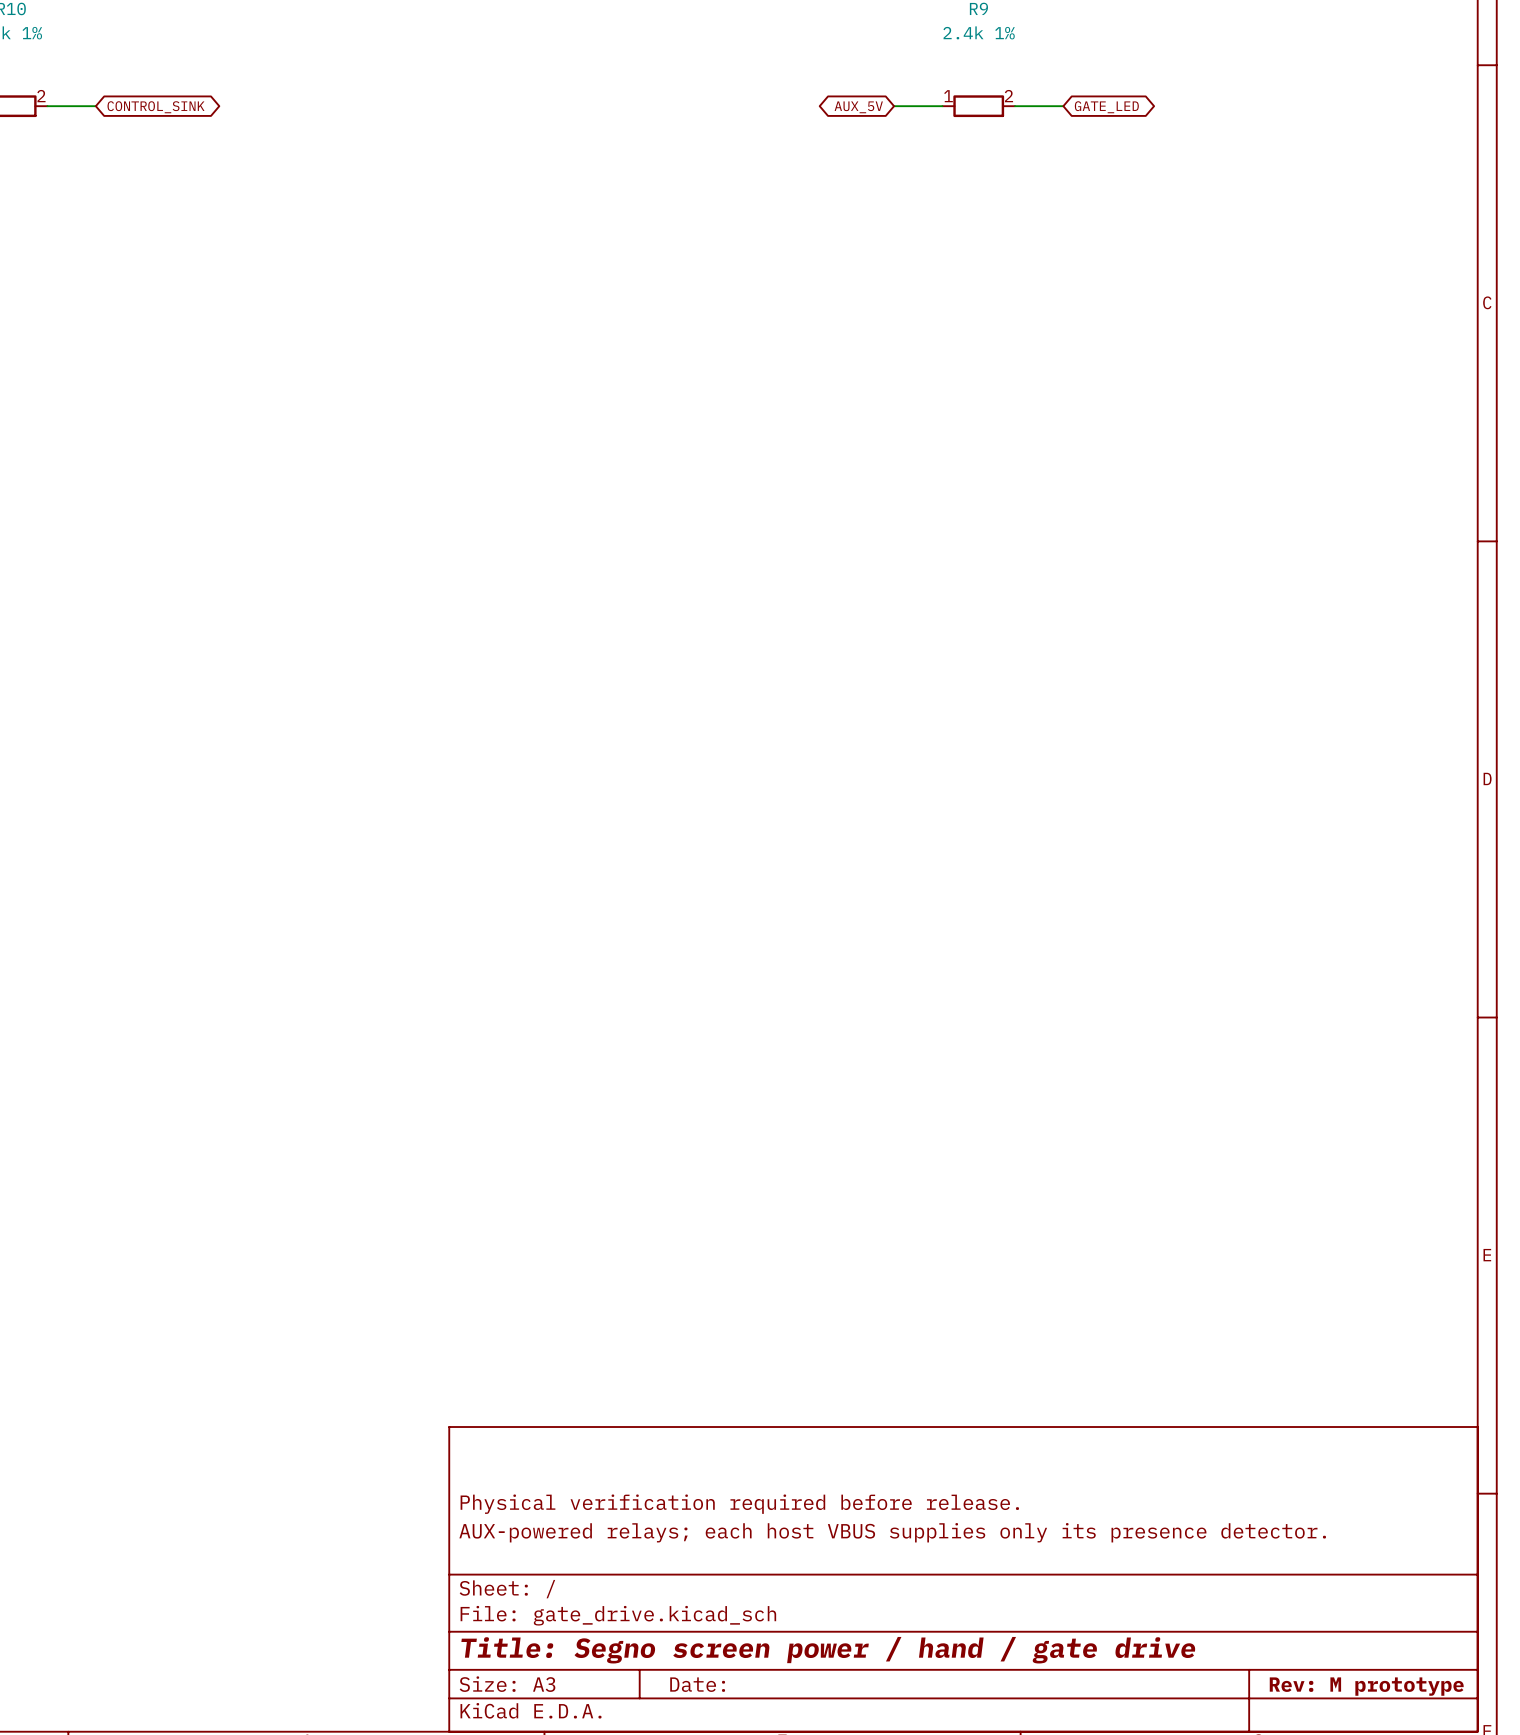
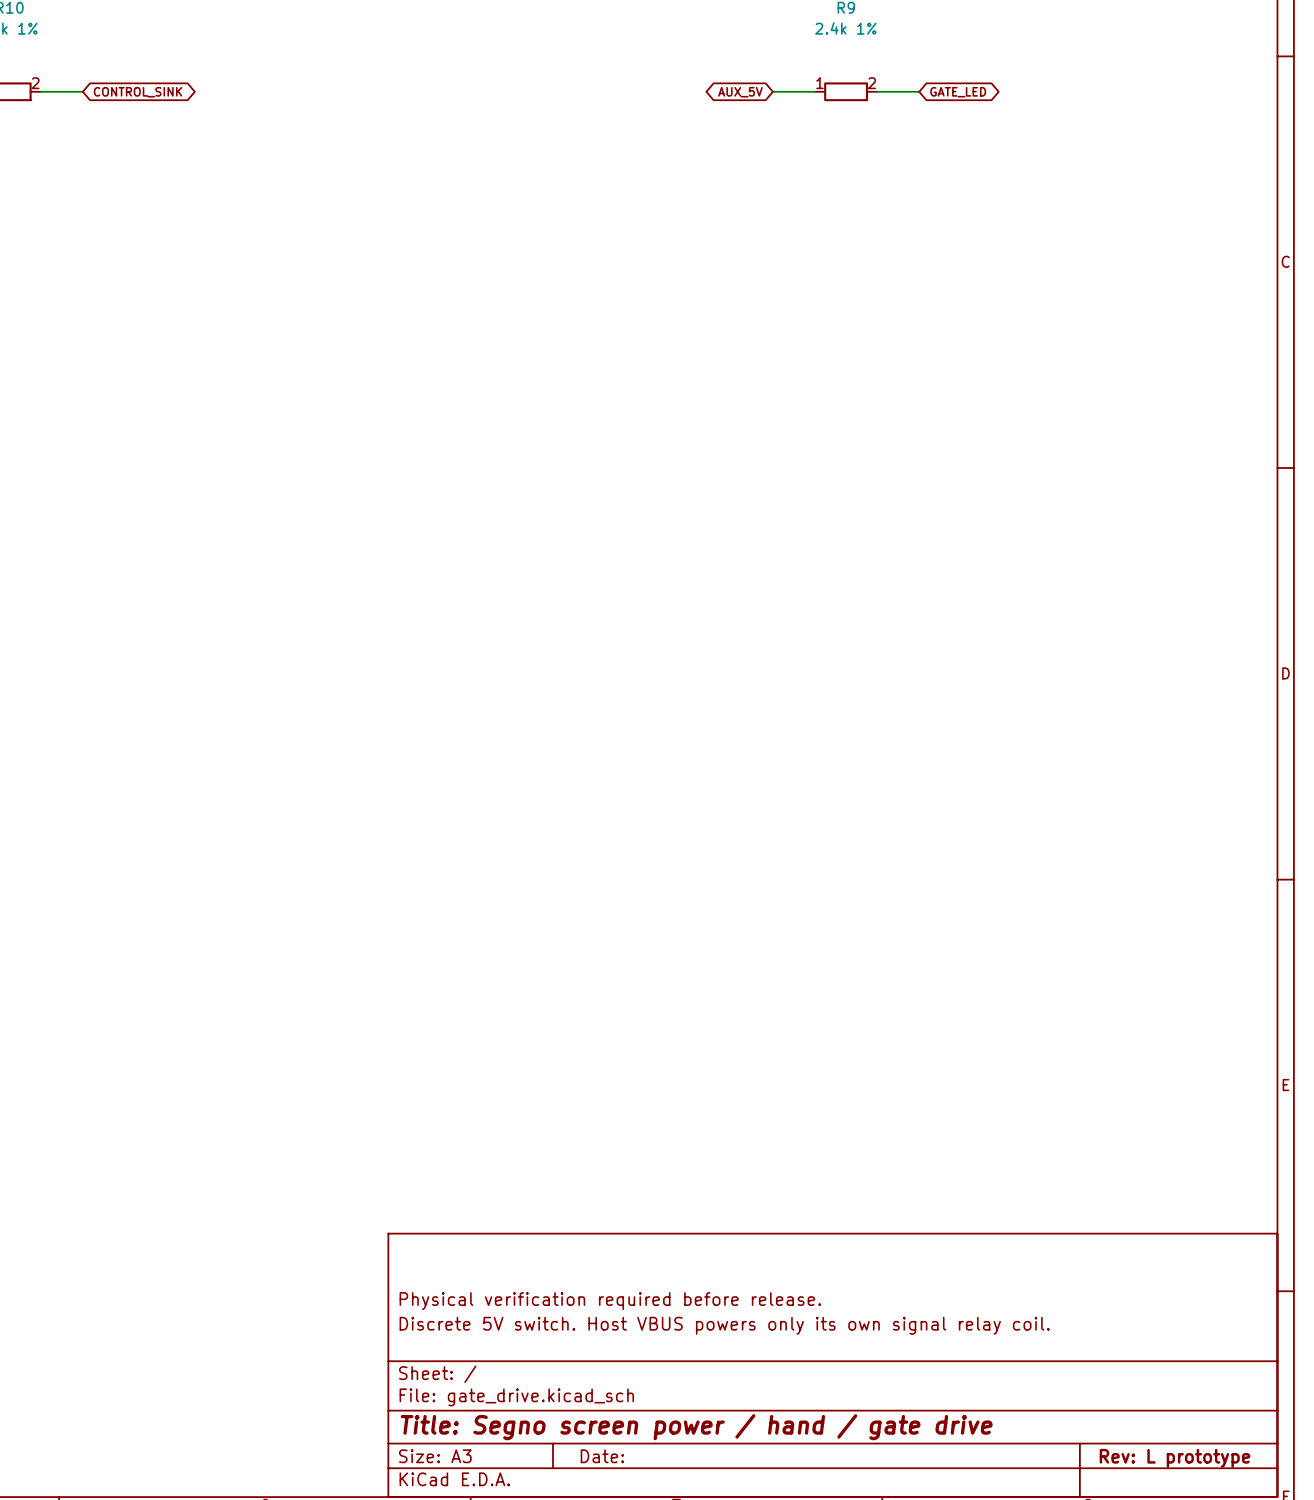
title block: AUX-powered relays; each host VBUS supplies only its presence detector. (892, 1532) -> Discrete 5V switch. Host VBUS powers only its own signal relay coil. (724, 1325)
title block: Rev: M prototype (1366, 1686) -> Rev: L prototype (1175, 1458)

